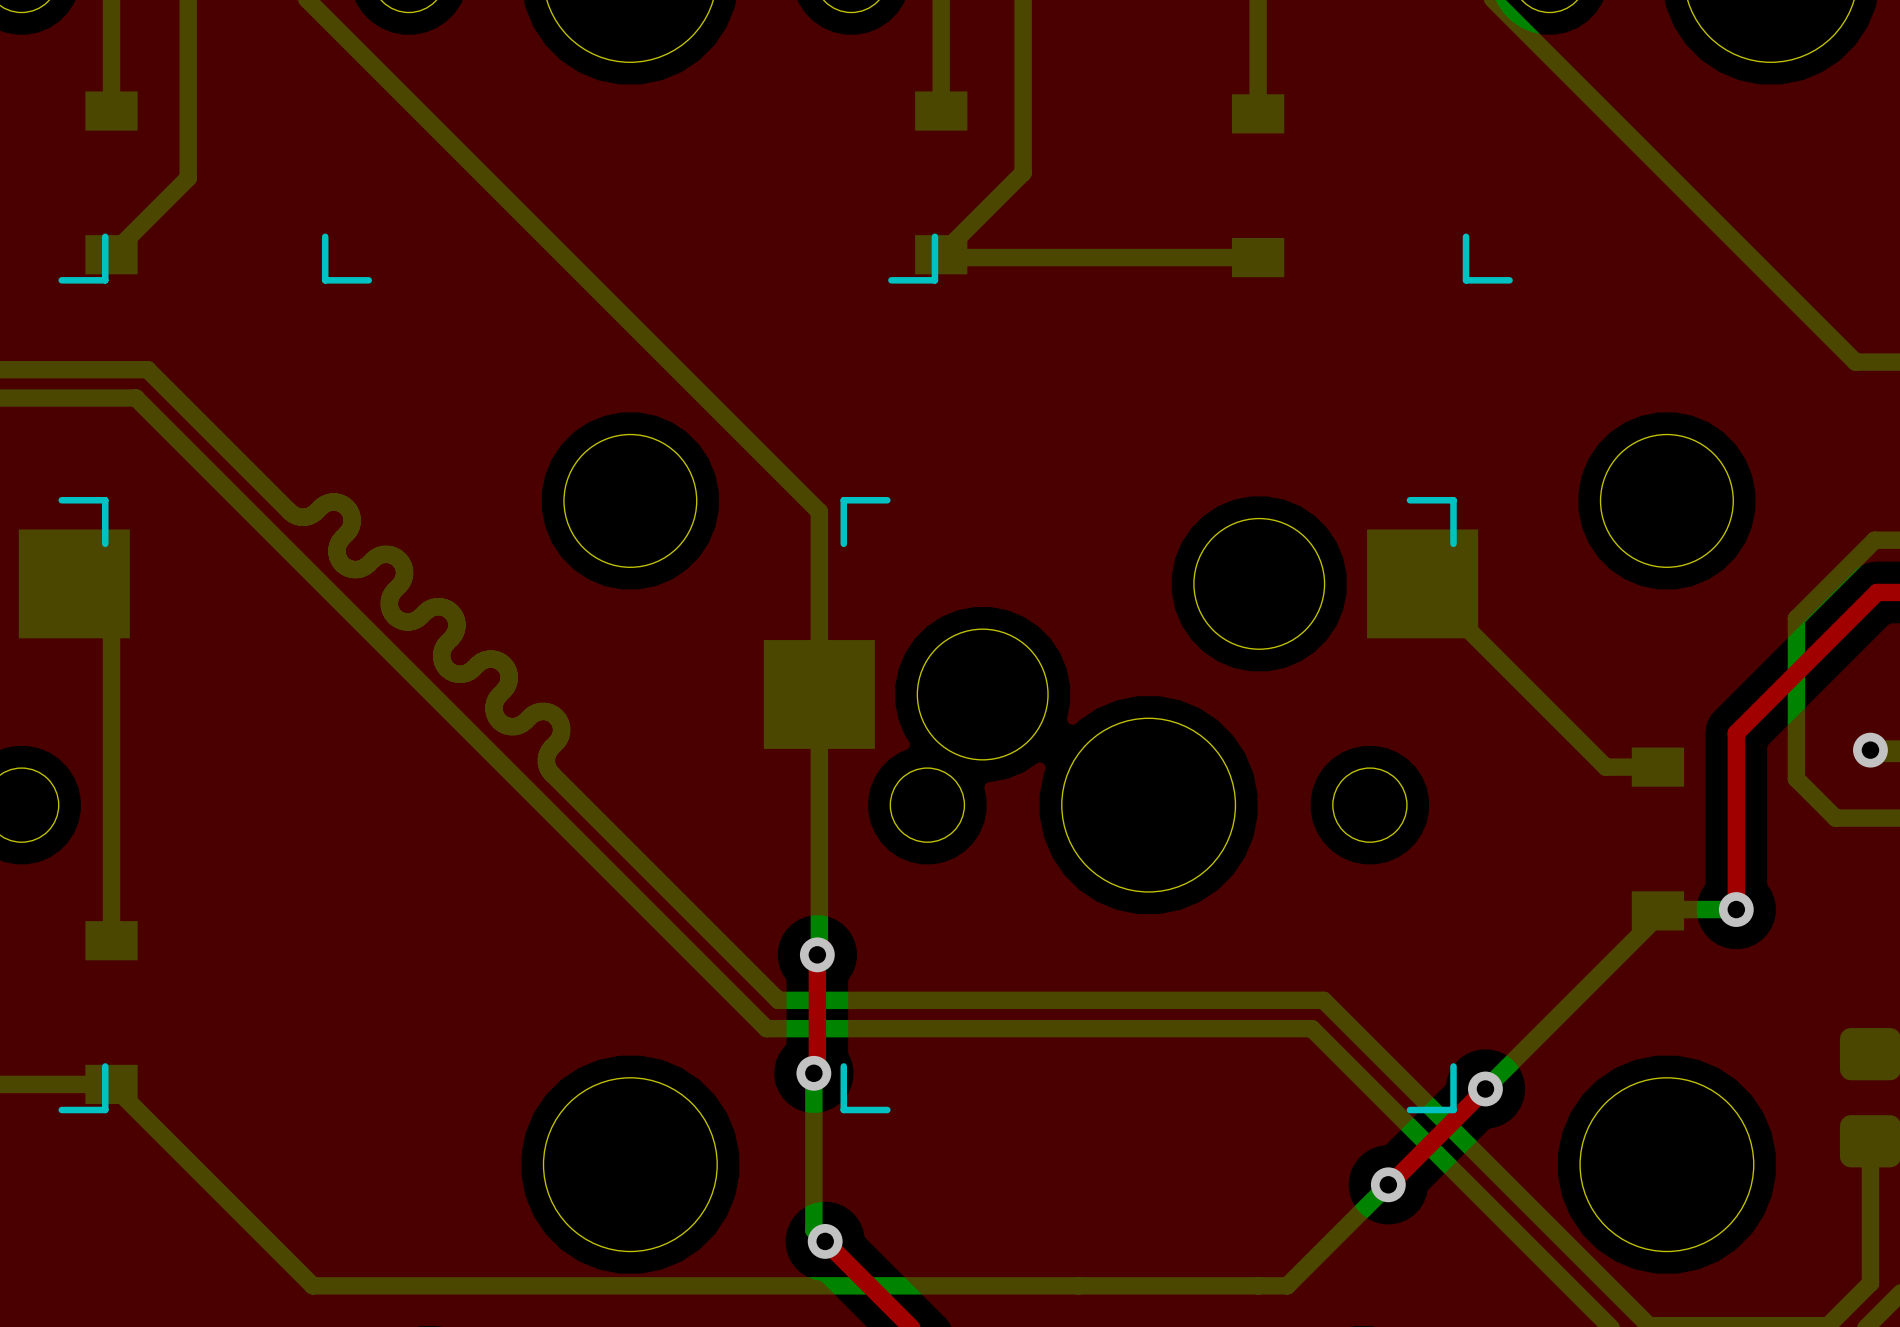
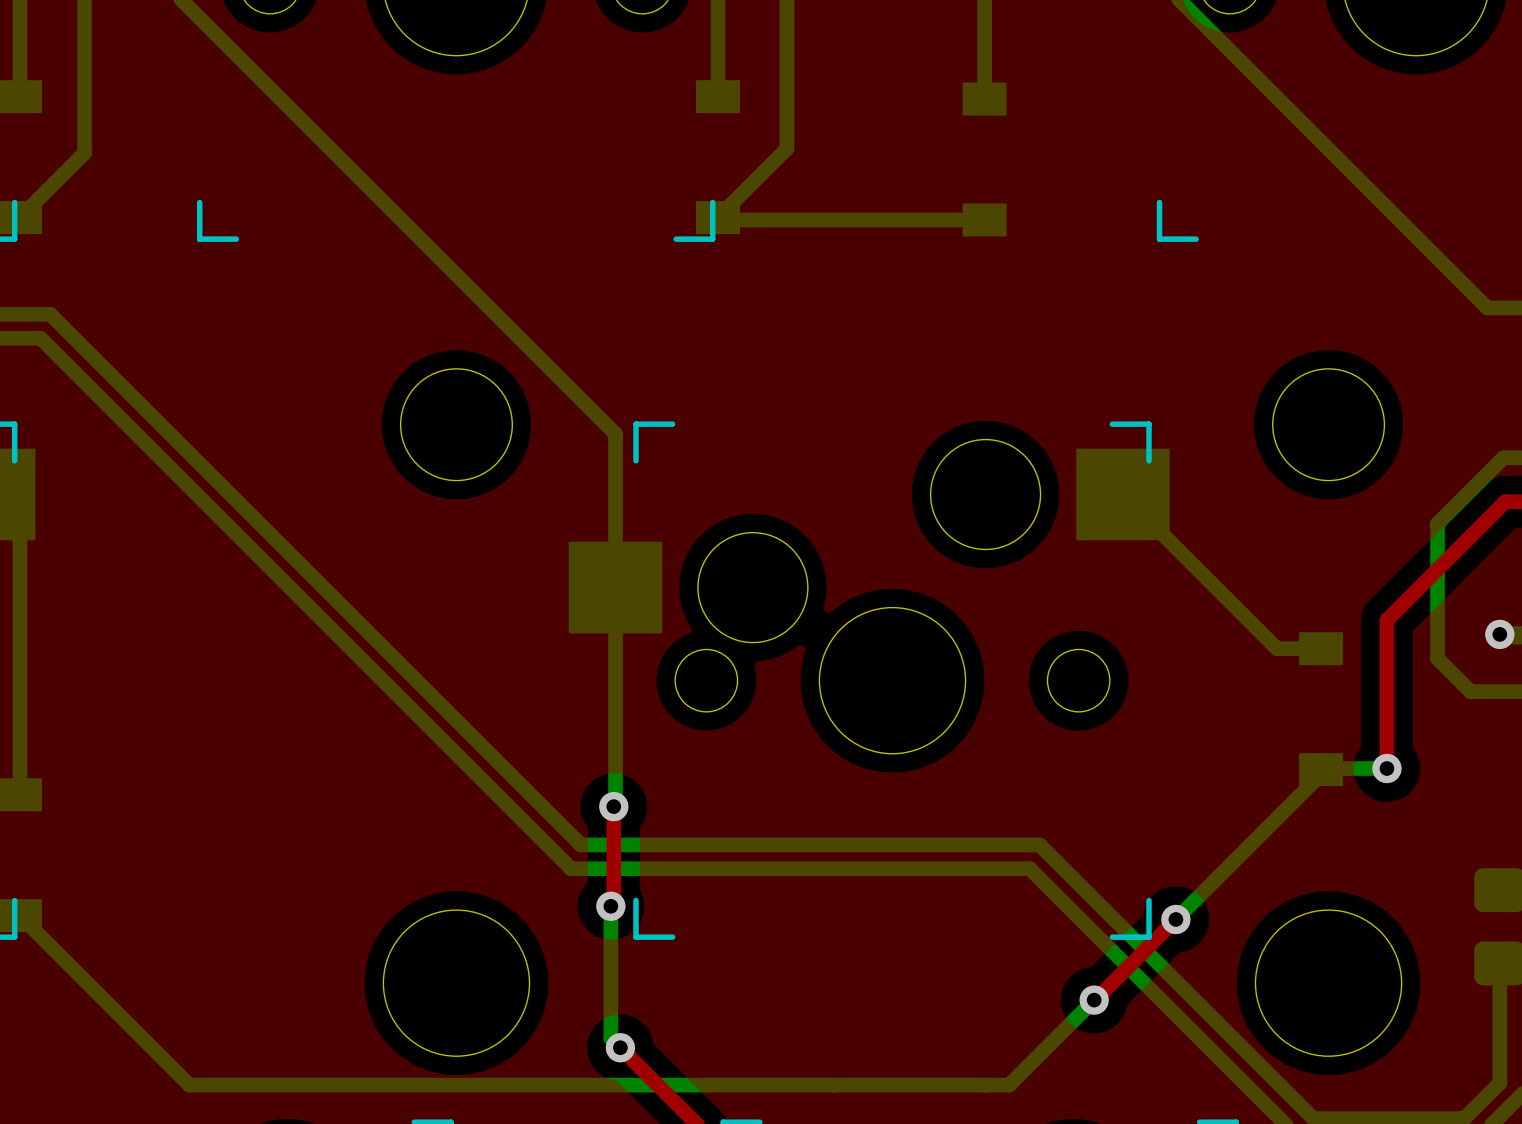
bottom track: (289, 511) (296, 516) (305, 517) (312, 514) (327, 502) (335, 502) (343, 504) (351, 514) (352, 522) (349, 530) (337, 545) (336, 553) (342, 564) (349, 568) (357, 569) (365, 566) (376, 557) (388, 554) (395, 557) (403, 566) (403, 578) (392, 593) (389, 601) (390, 609) (394, 616) (401, 621) (409, 621) (417, 619) (432, 607) (440, 606) (451, 612) (456, 623) (455, 631) (444, 646) (441, 653) (442, 662) (446, 668) (453, 673) (462, 674) (469, 671) (484, 660) (496, 660) (506, 667) (509, 675) (506, 687) (496, 698) (494, 706) (494, 714) (499, 721) (510, 726) (518, 725) (533, 714) (541, 711) (549, 712) (558, 719) (561, 727) (560, 735) (549, 750) (546, 758) (547, 766) (551, 773) -> (170, 433) (390, 654)

